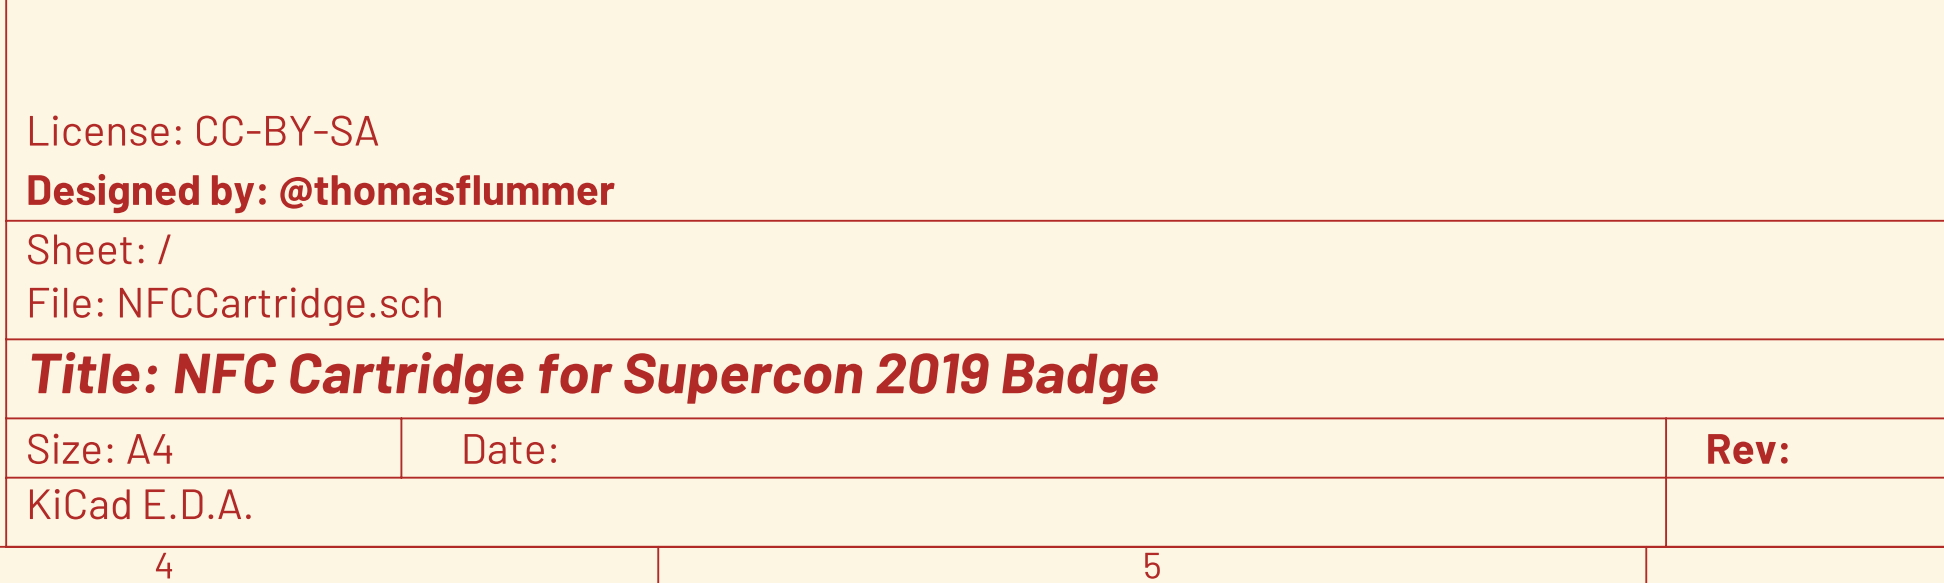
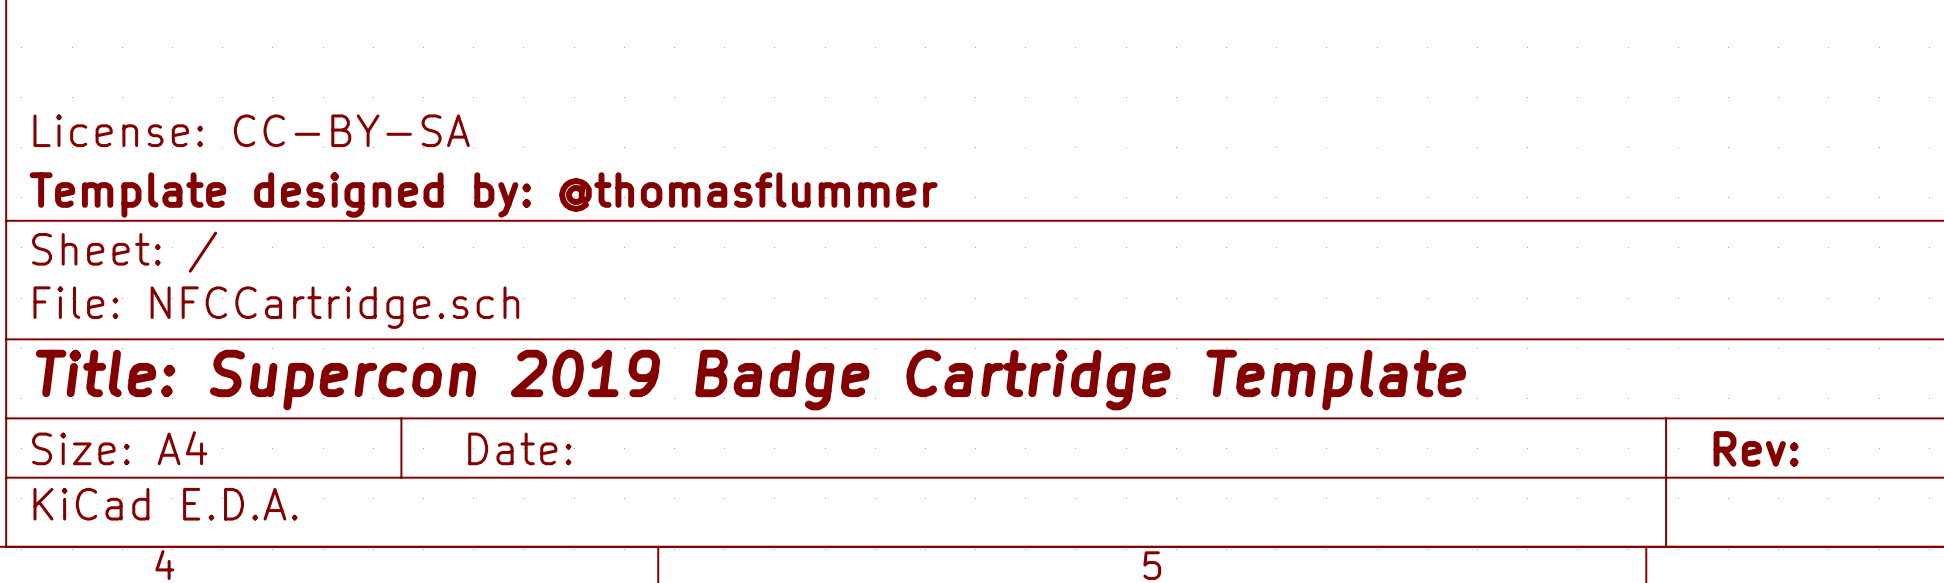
title block: Designed by: @thomasflummer (321, 193) -> Template designed by: @thomasflummer (483, 194)
title block: Title: NFC Cartridge for Supercon 2019 Badge (594, 378) -> Title: Supercon 2019 Badge Cartridge Template (750, 380)

